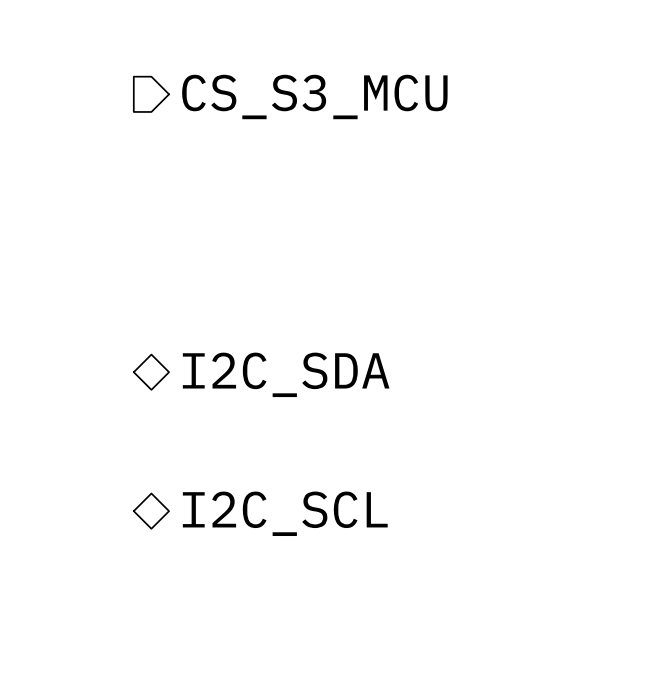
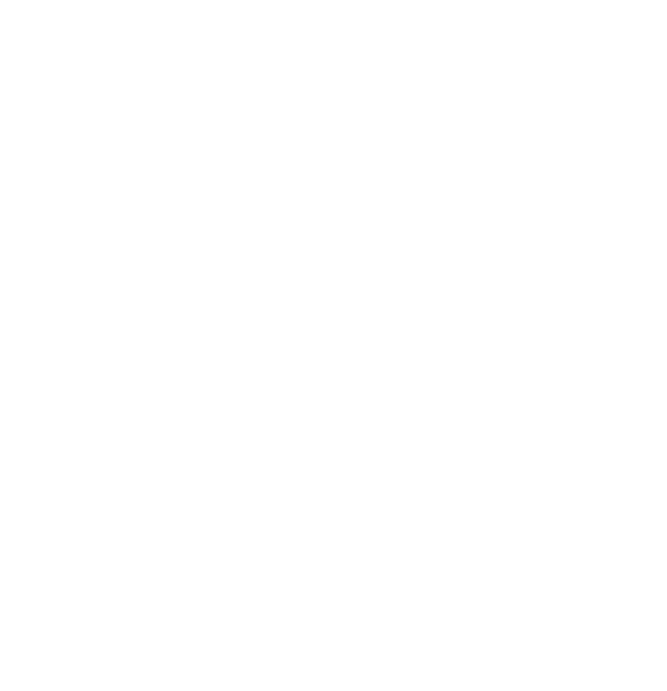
hierarchical label: CS_S3_MCU (314, 96) -> none
hierarchical label: I2C_SDA (286, 374) -> none
hierarchical label: I2C_SCL (285, 513) -> none

